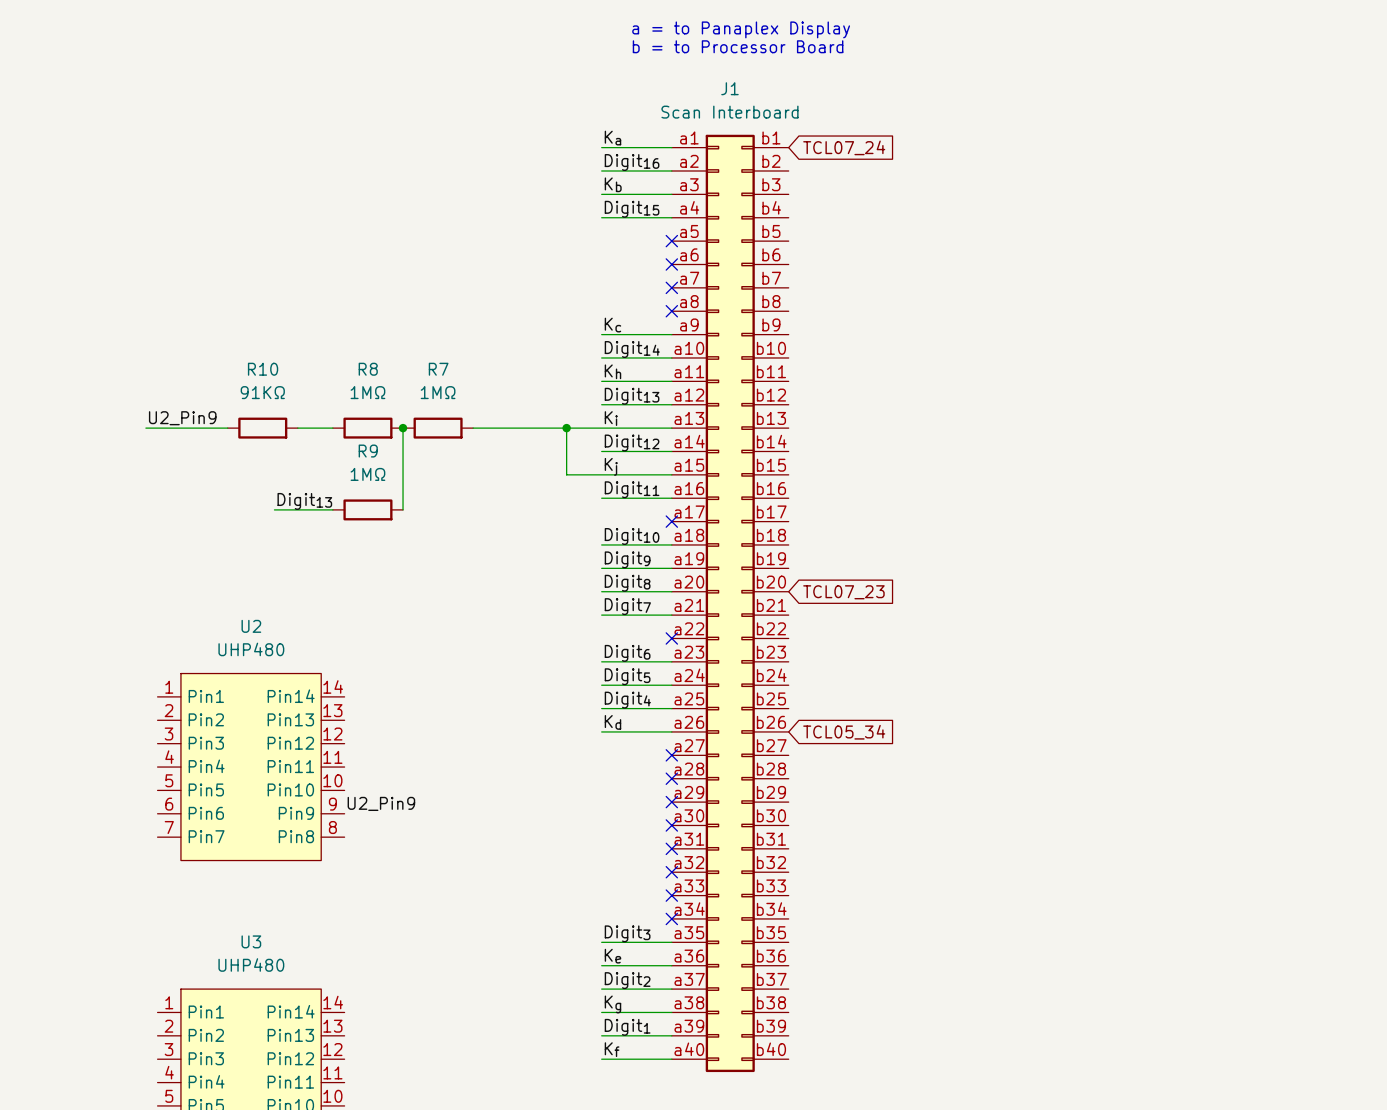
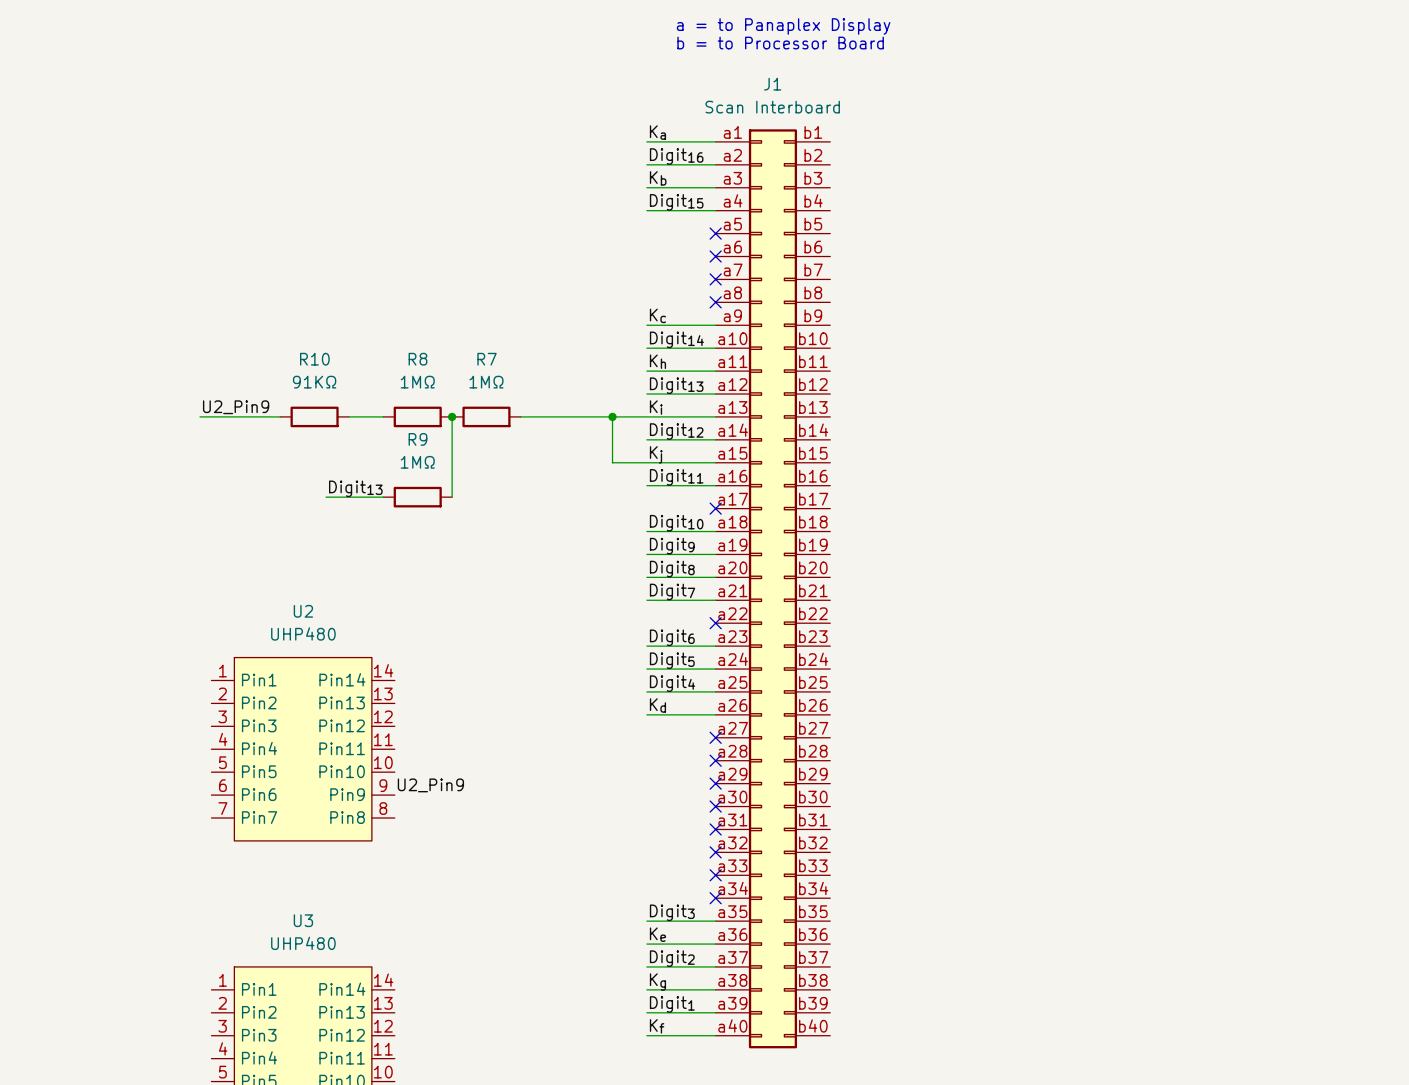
global label: TCL07_24 (844, 147) -> none
global label: TCL07_23 (843, 592) -> none
global label: TCL05_34 (844, 732) -> none

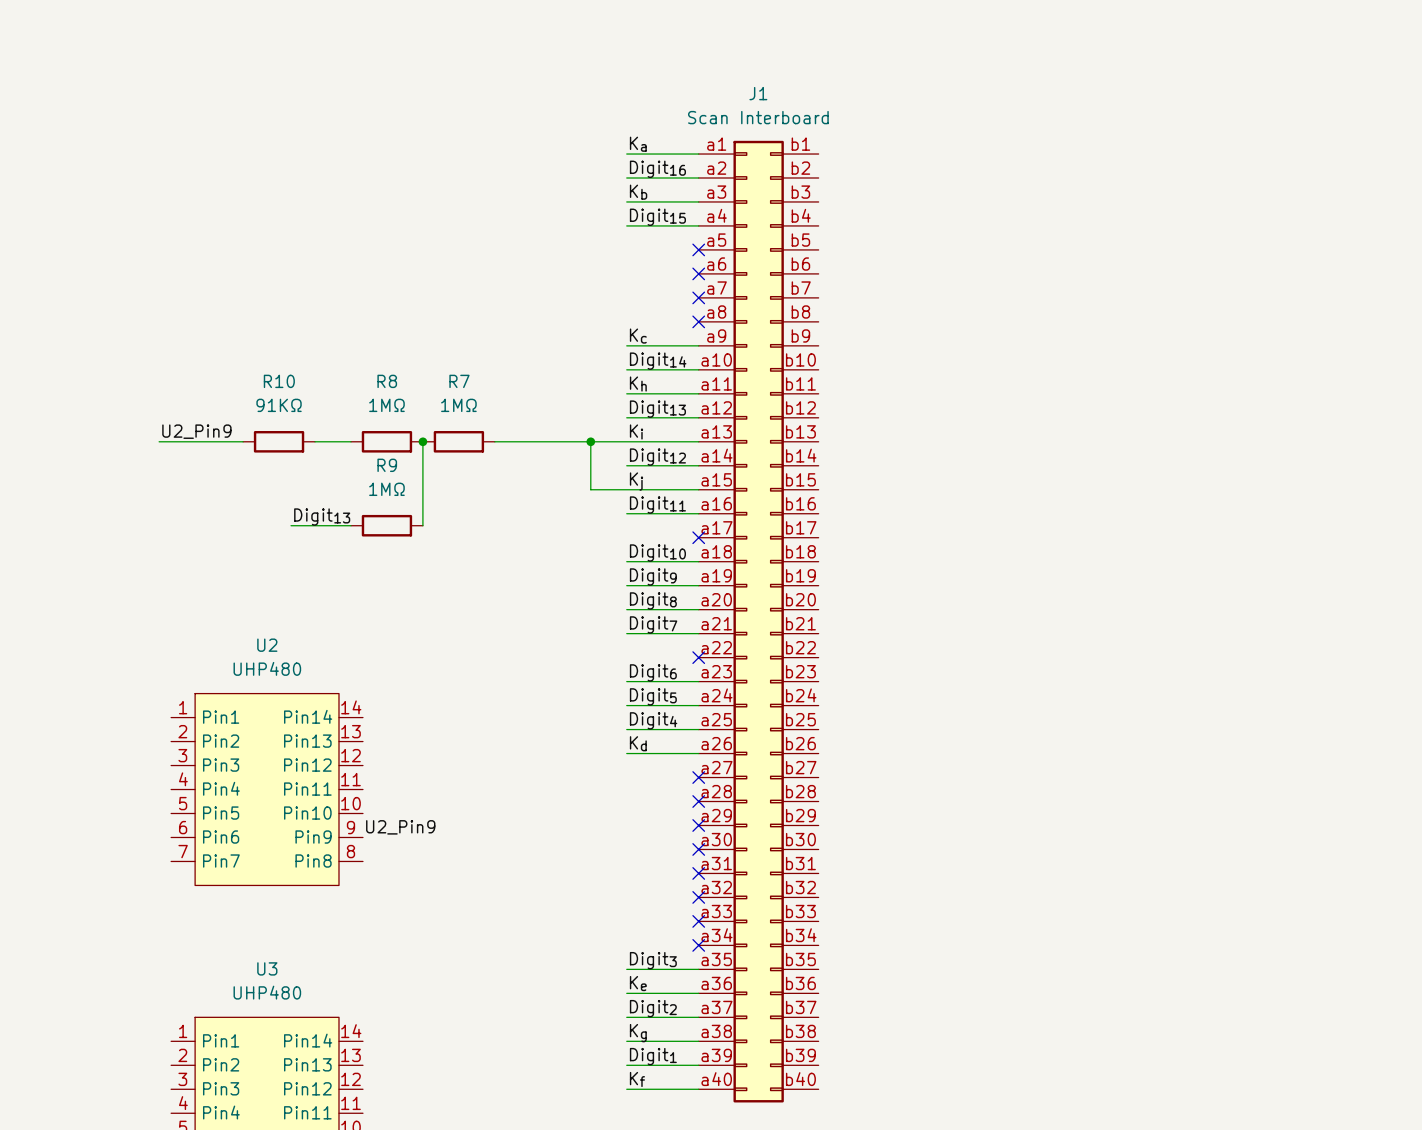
text: a = to Panaplex Display (783, 26) -> none
text: b = to Processor Board (780, 43) -> none

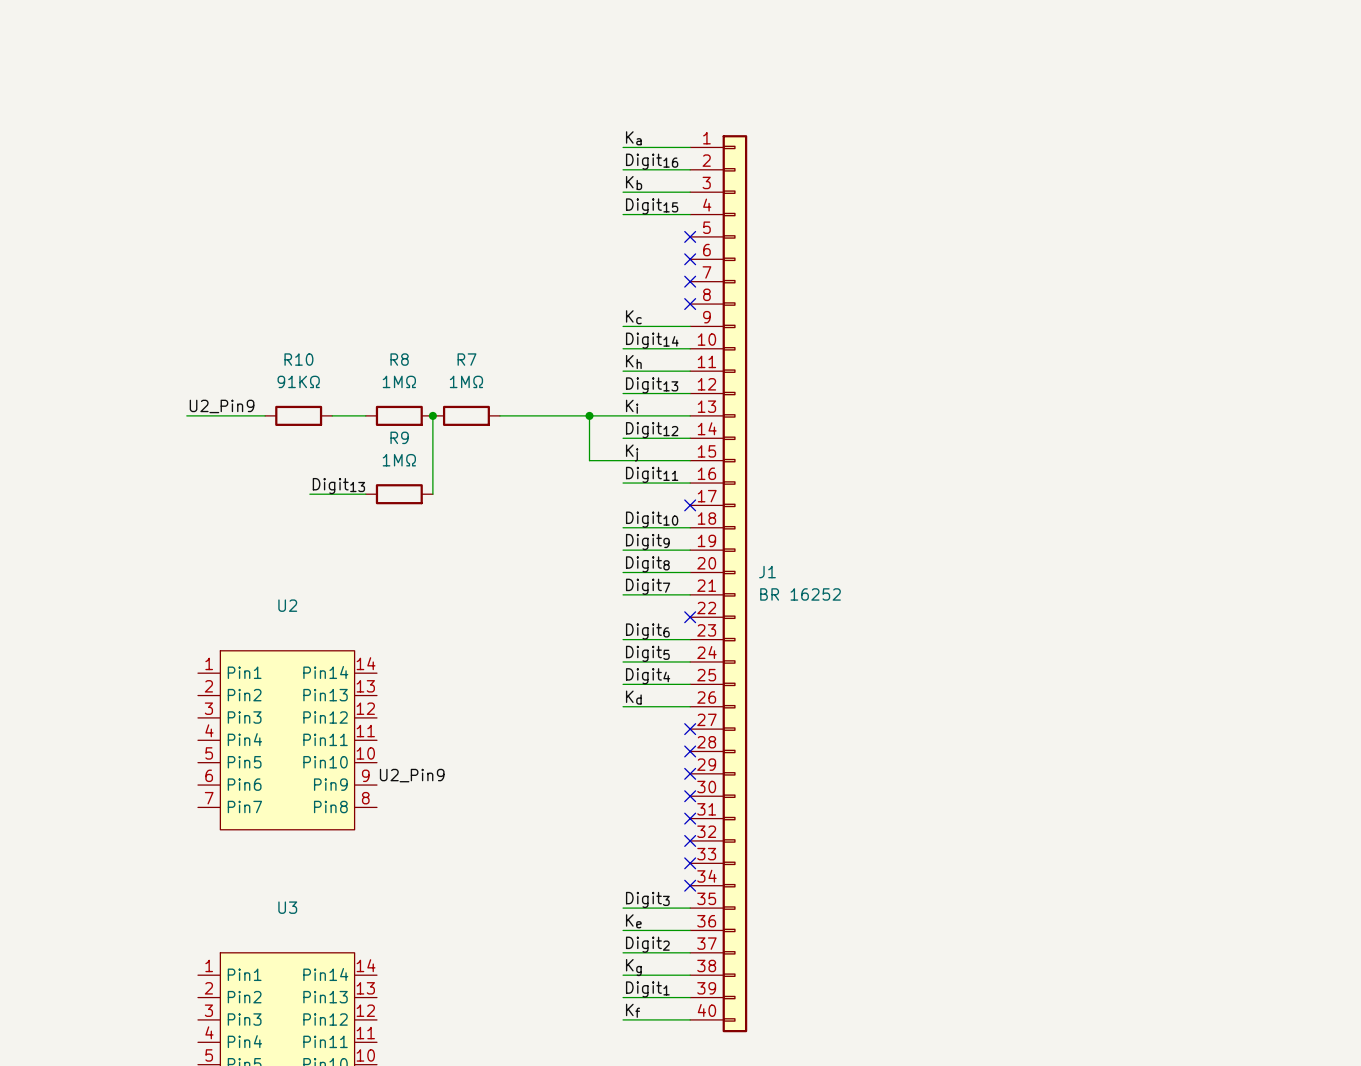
J1 name position: J1 (758, 93) -> J1 (767, 572)
J1 value: Scan Interboard (758, 117) -> BR 16252 (800, 594)
J1 symbol: [698, 140, 819, 1103] -> [690, 135, 748, 1033]
U2 value: UHP480 (267, 668) -> none
U3 value: UHP480 (267, 992) -> none

